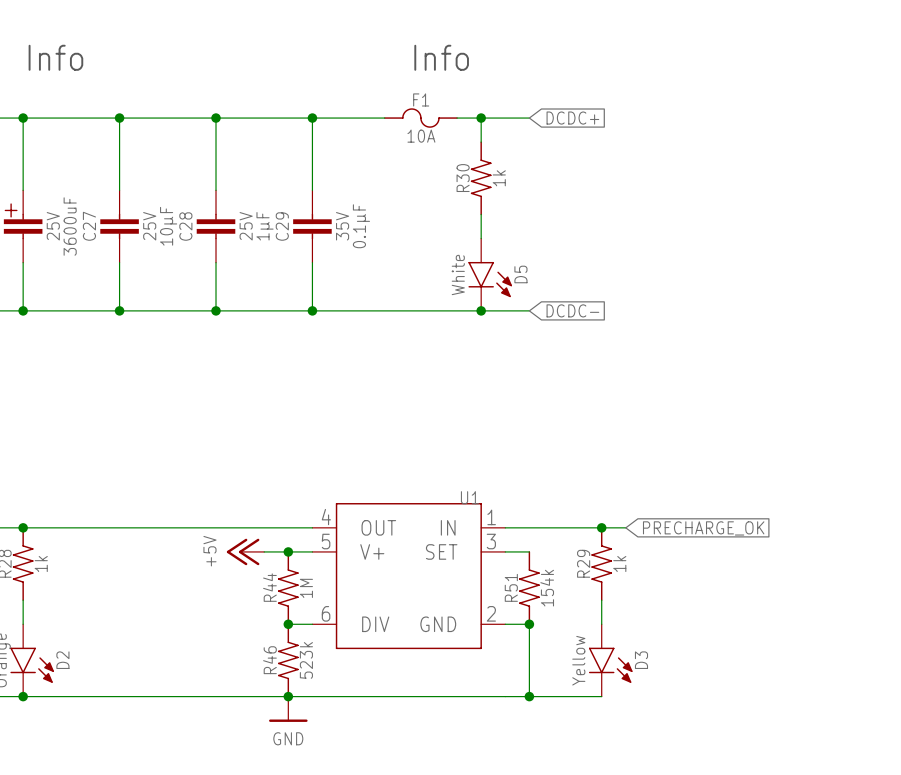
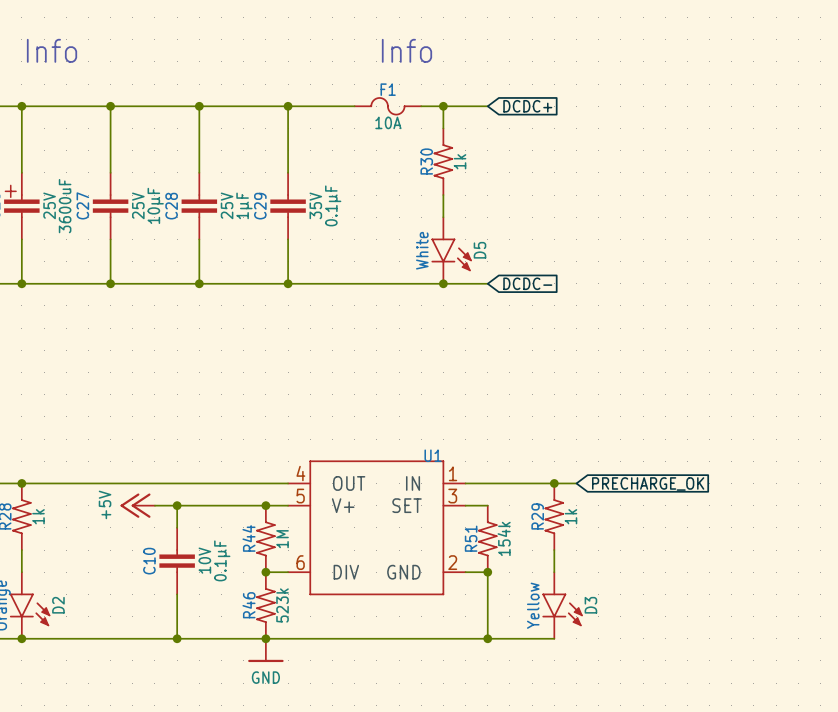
wire: none -> (154, 505) (243, 505)
wire: none -> (177, 505) (177, 527)
junction: none -> (177, 505)
power symbol position: +5V (245, 551) -> +5V (137, 505)
C10: none -> (177, 561)
wire: none -> (177, 594) (177, 638)
junction: none -> (177, 638)

